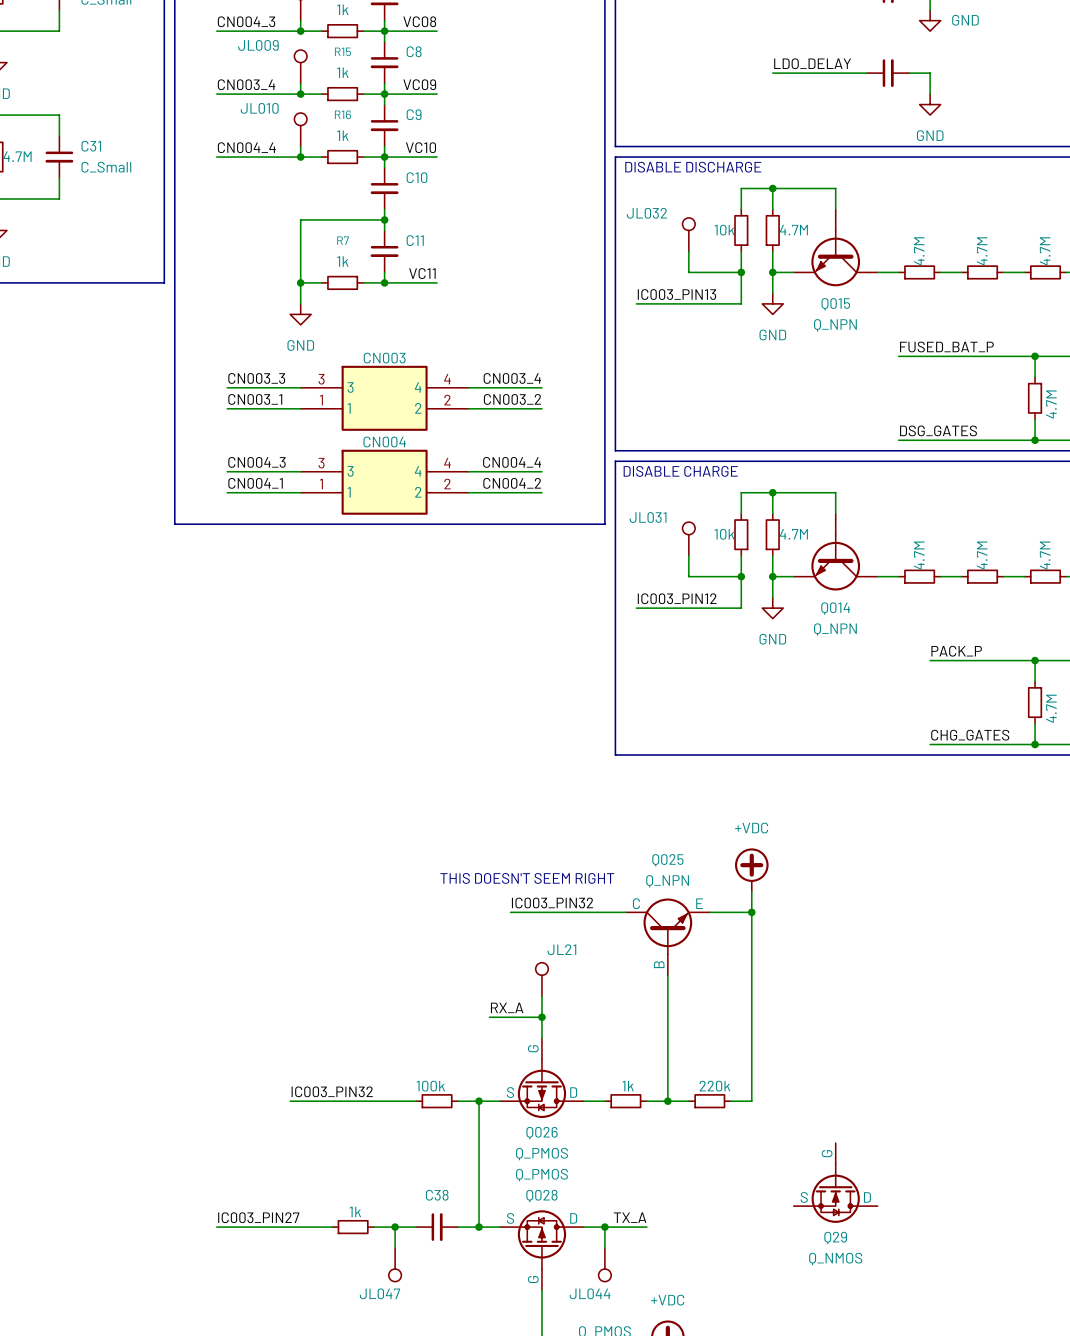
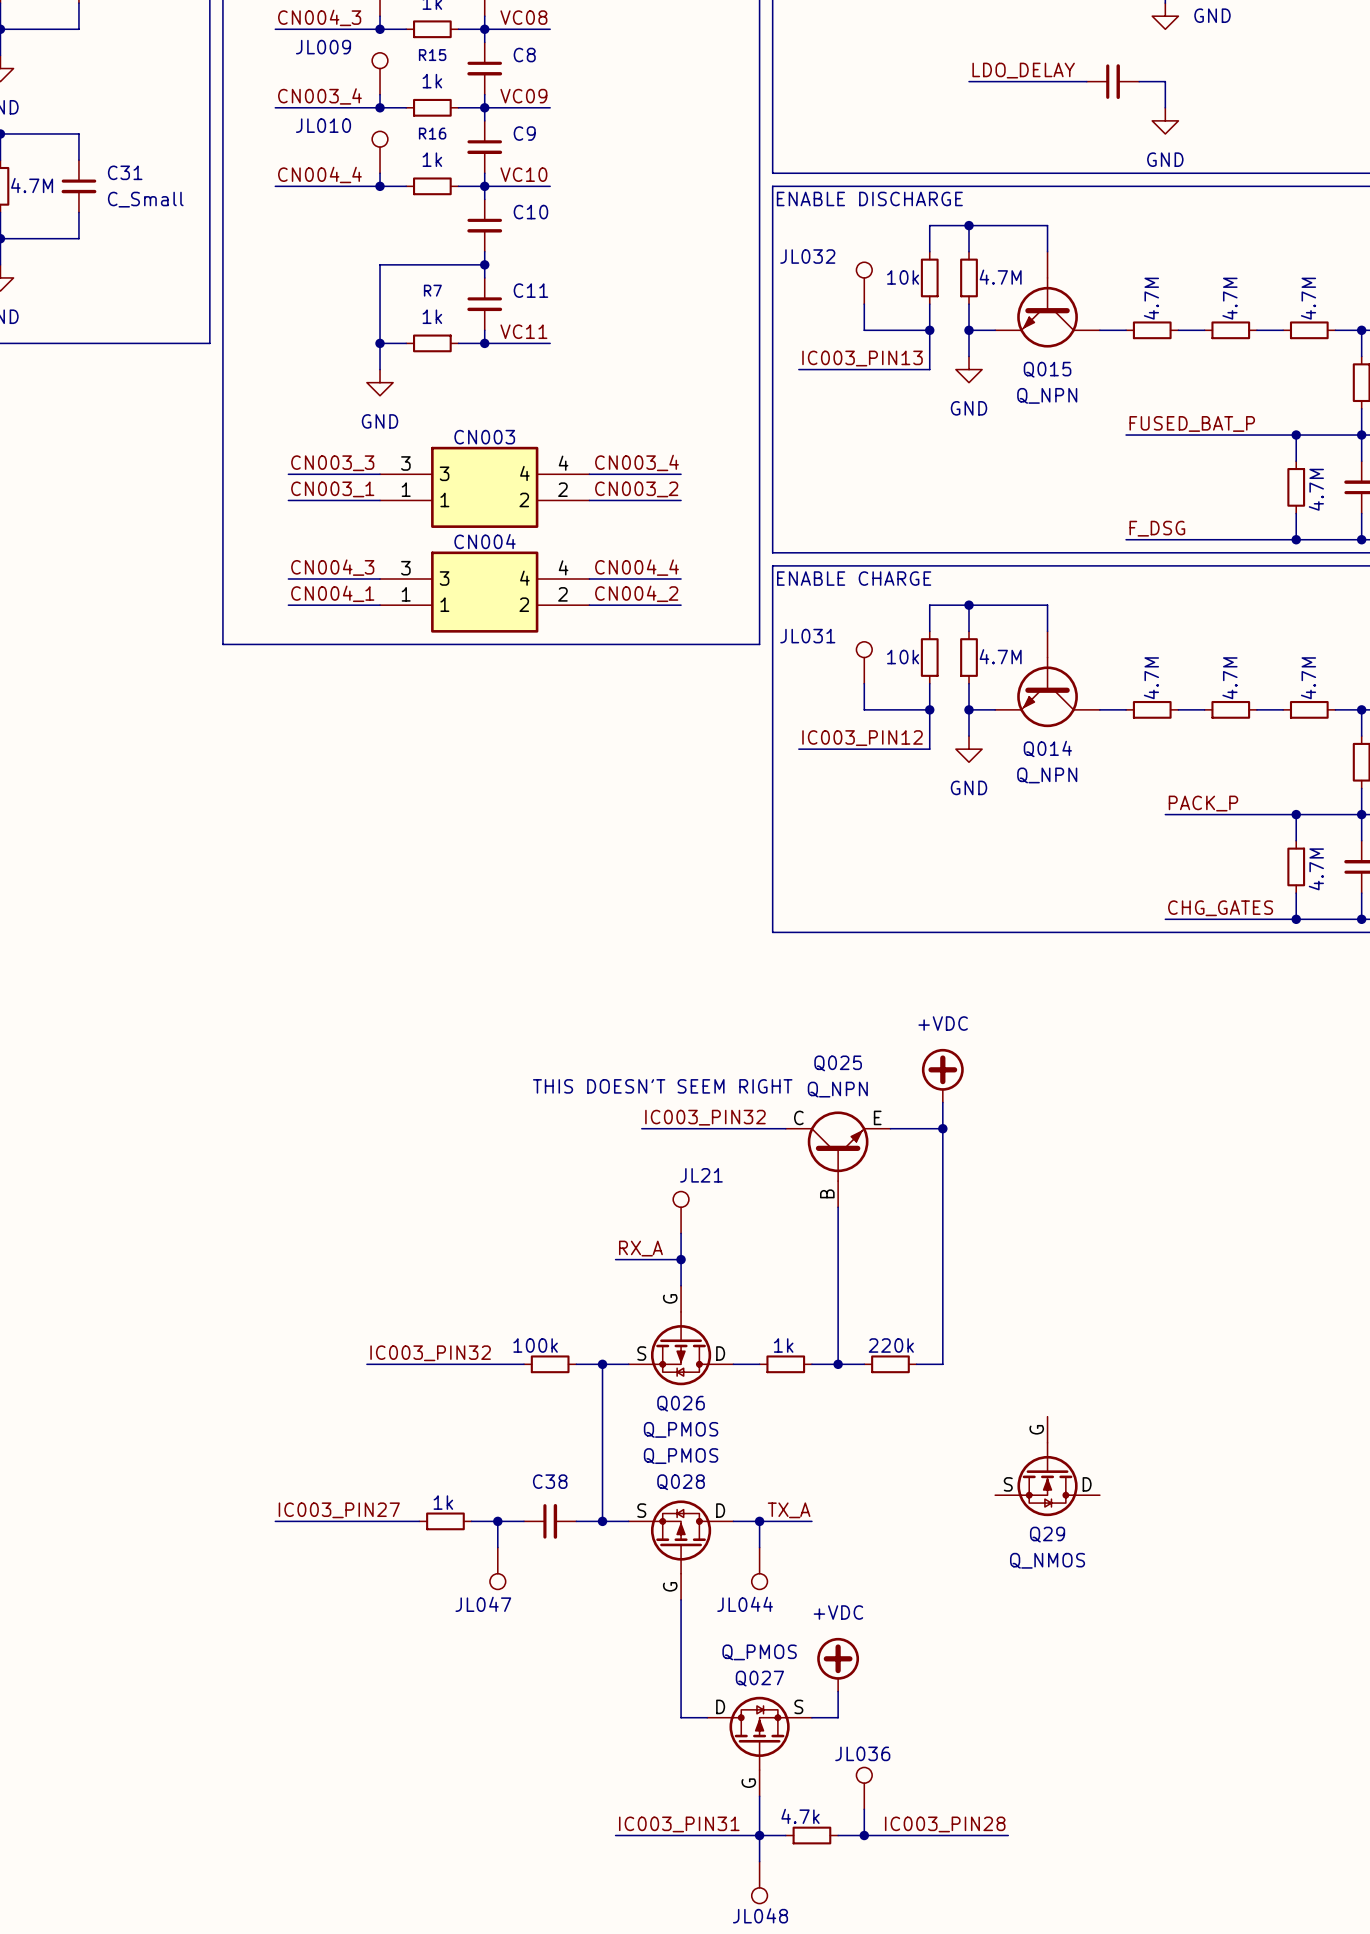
text: DISABLE DISCHARGE (693, 167) -> ENABLE DISCHARGE (869, 198)
label: DSG_GATES (938, 430) -> F_DSG (1157, 528)
text: DISABLE CHARGE (680, 471) -> ENABLE CHARGE (854, 578)

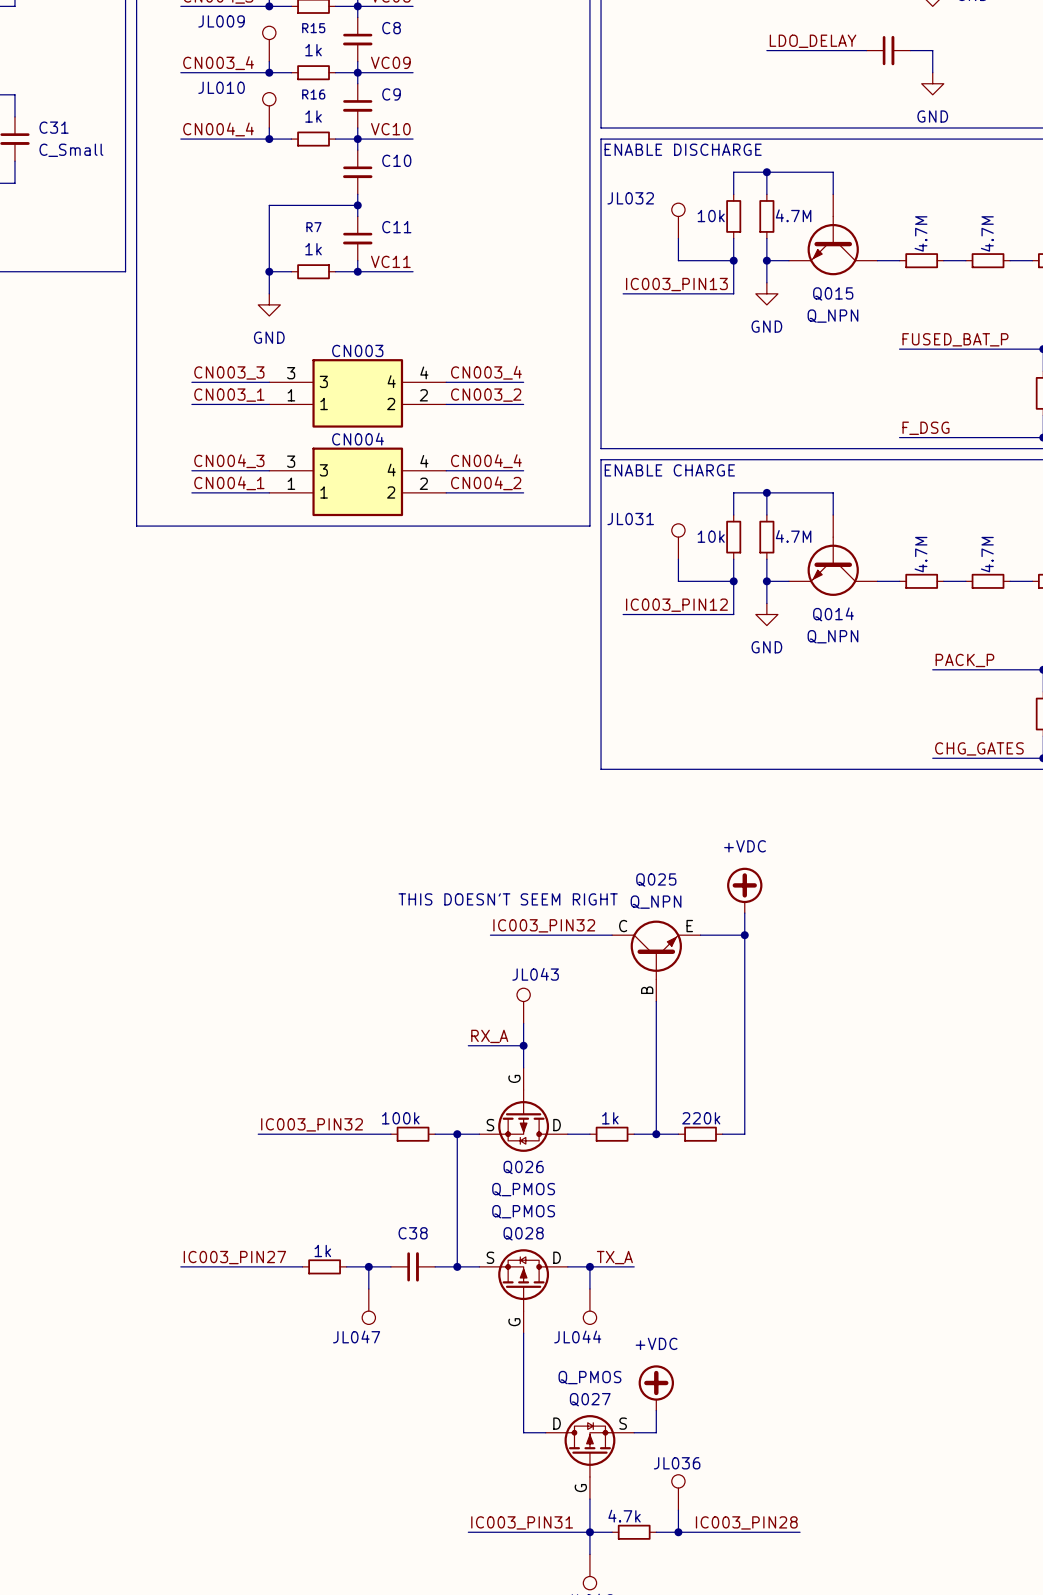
JL21 name: JL21 (701, 1175) -> JL043 (535, 974)
Q29: Q_NMOS (1047, 1466) -> none

